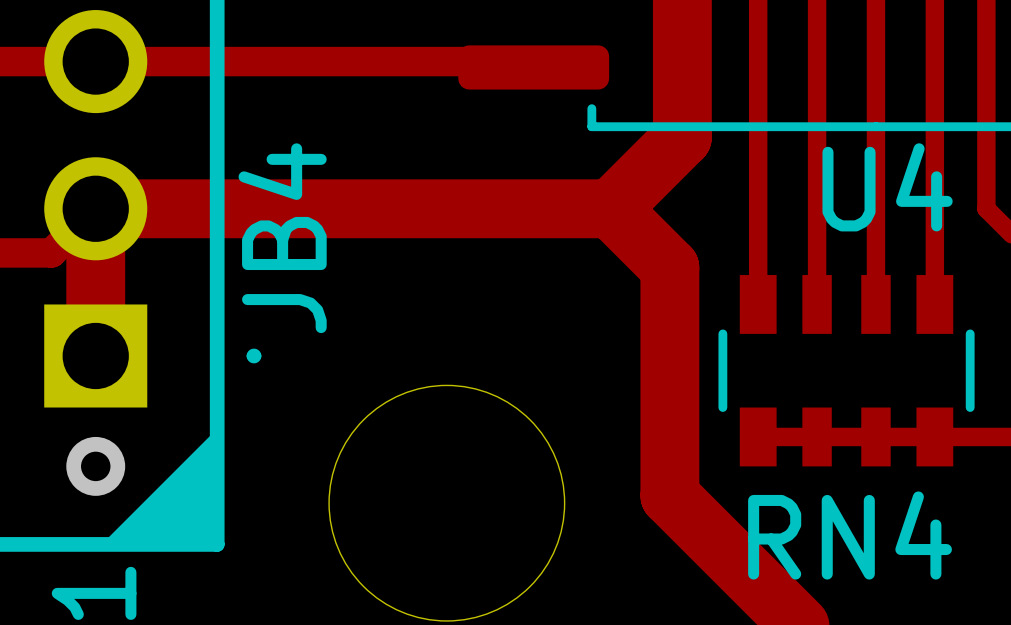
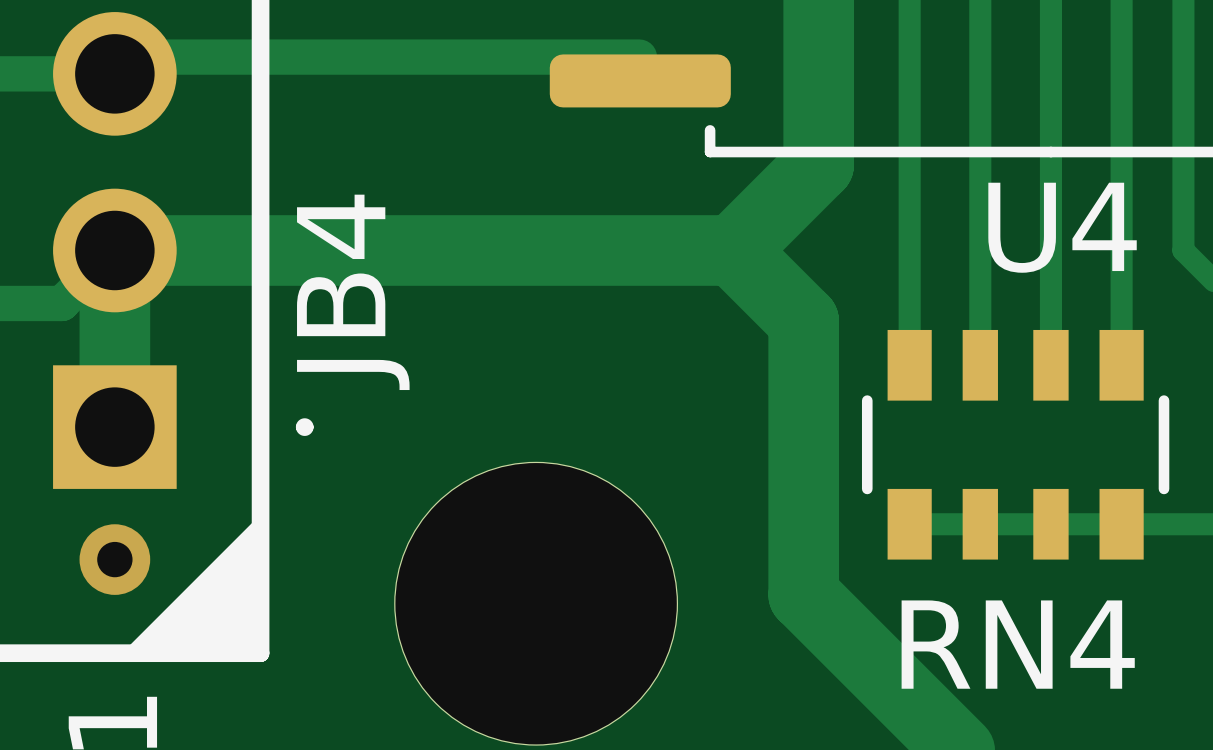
track: none -> (131, 57) (639, 57)
track: (95, 61) (527, 61) (533, 67) -> none

